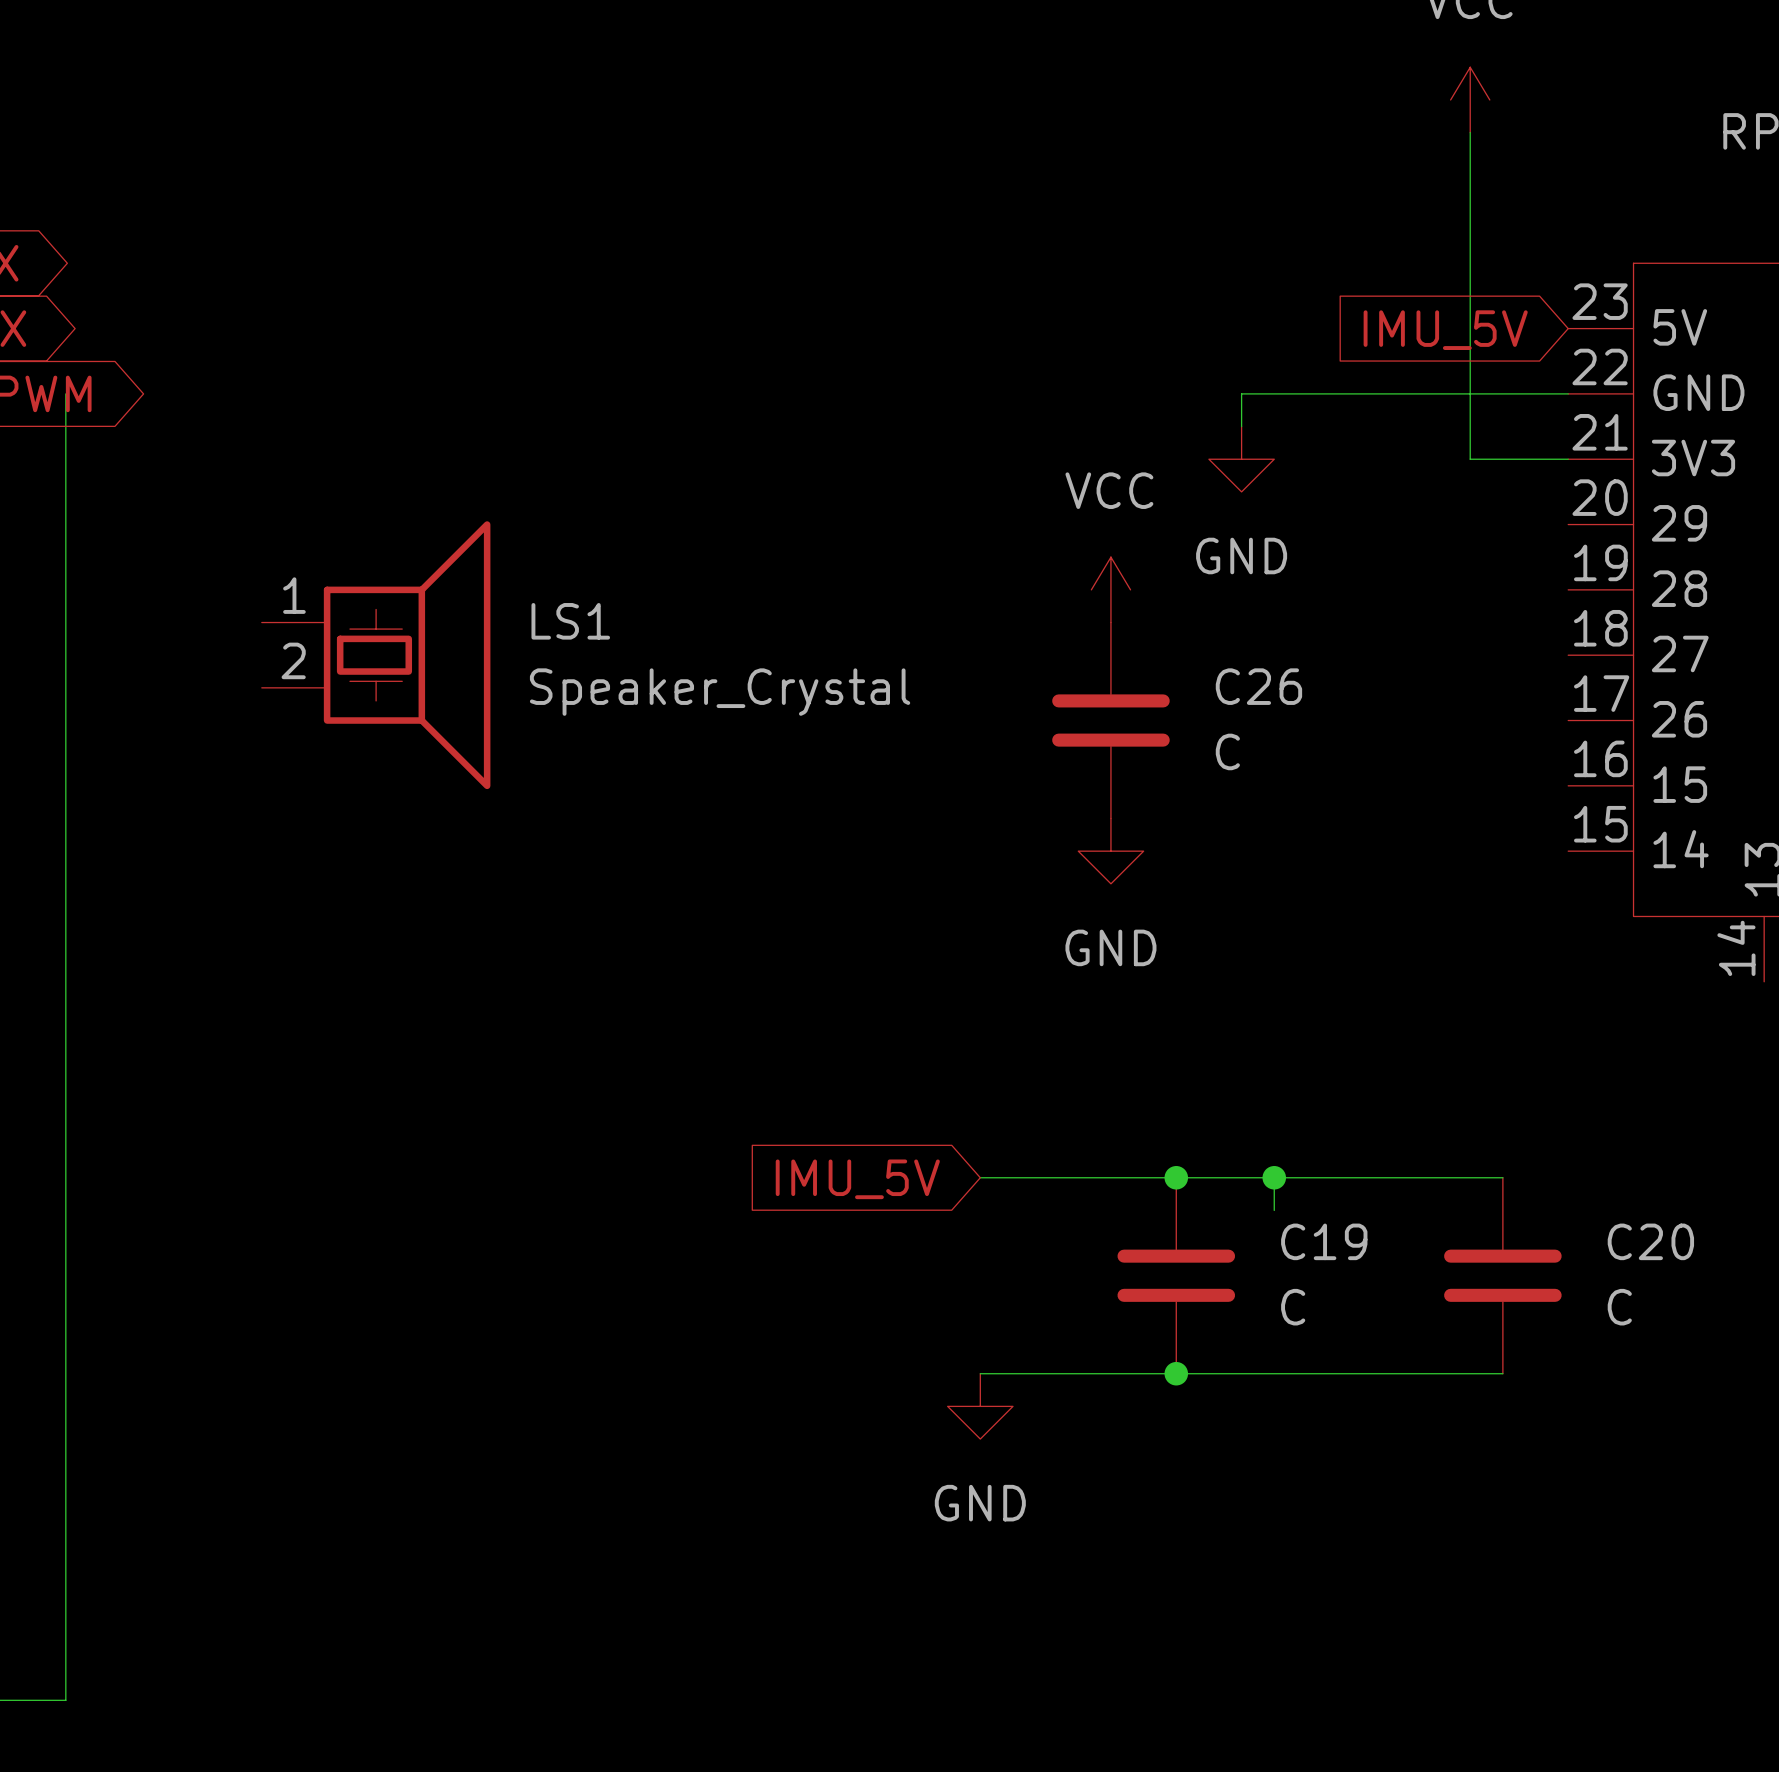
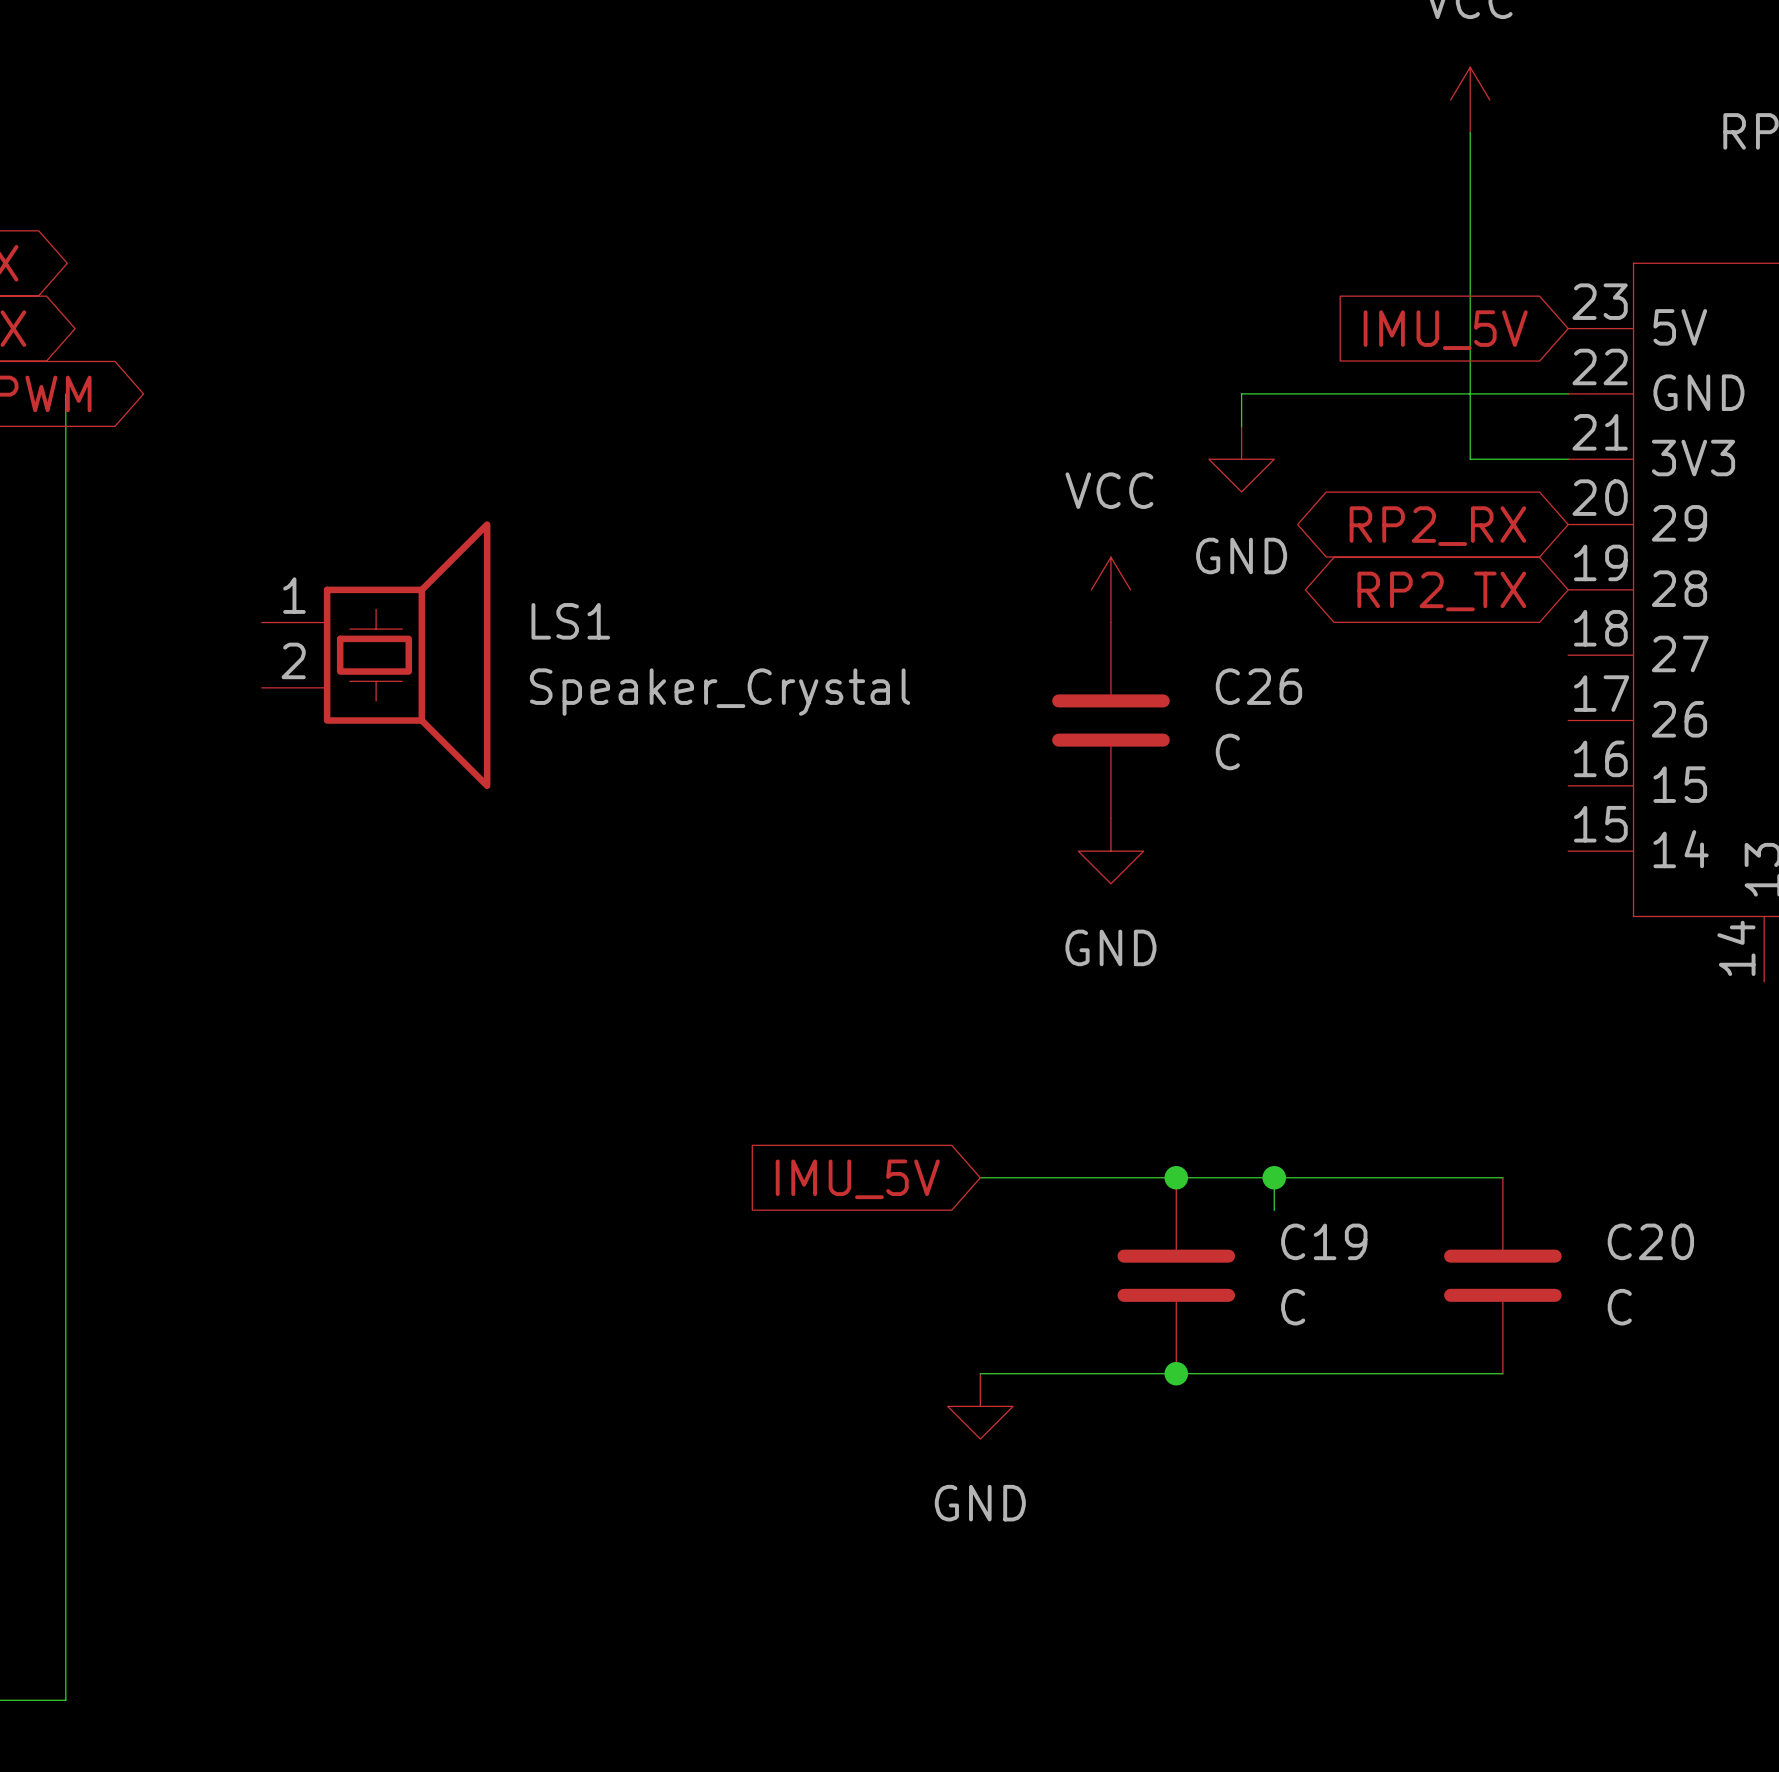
global label: none -> RP2_RX (1437, 526)
global label: none -> RP2_TX (1441, 591)

